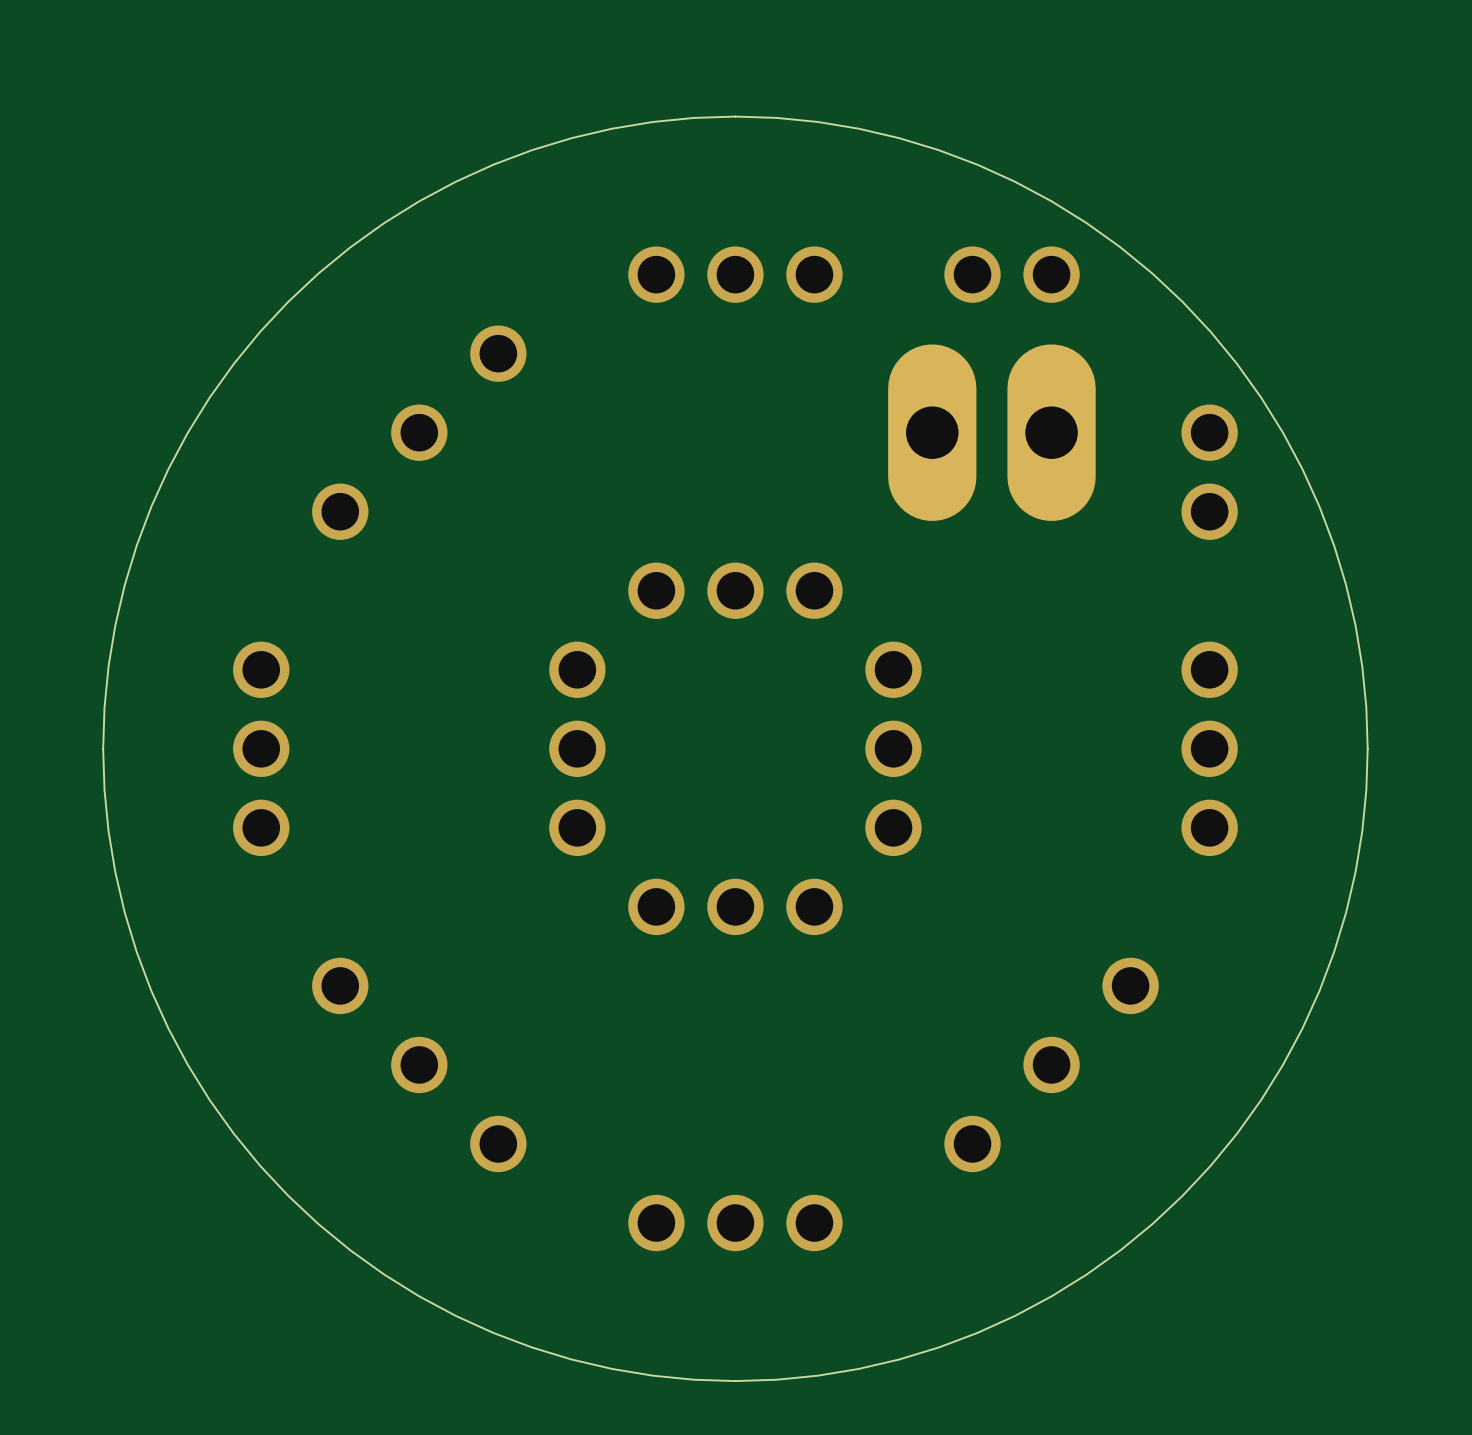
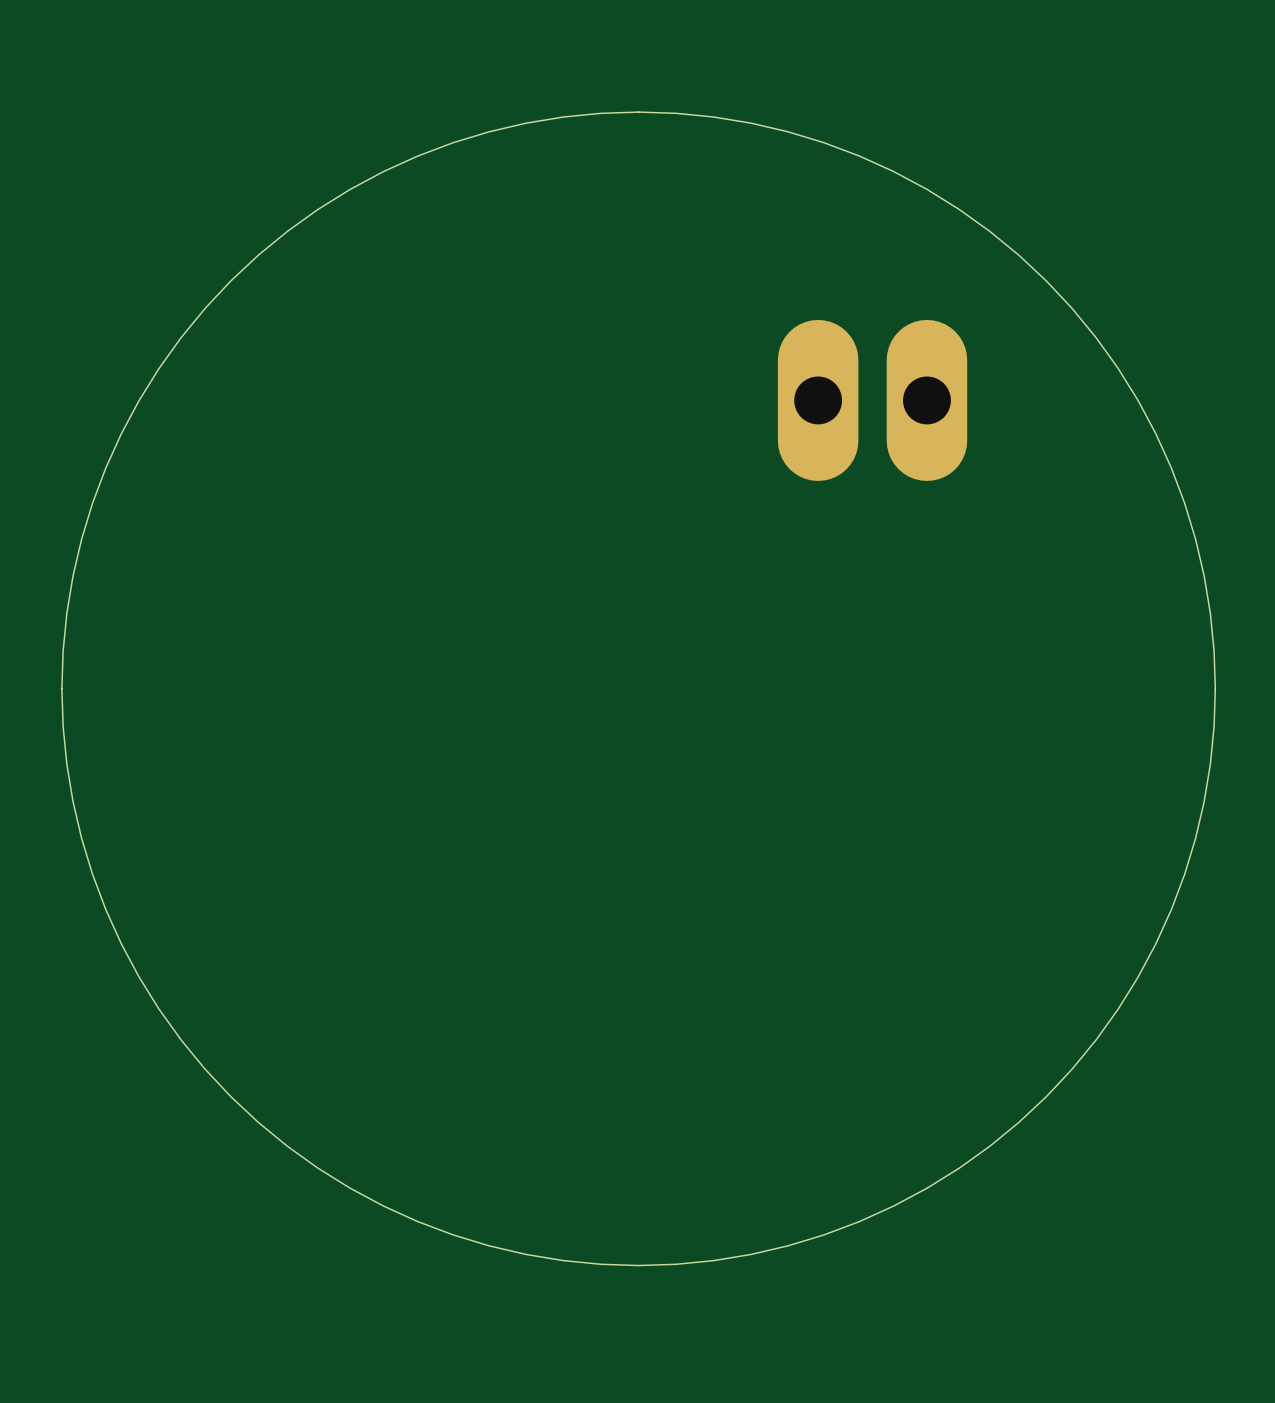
via: (656, 274) -> none
via: (735, 274) -> none
via: (814, 274) -> none
via: (972, 274) -> none
via: (1051, 274) -> none
via: (498, 353) -> none
via: (419, 432) -> none
via: (1209, 432) -> none
via: (340, 511) -> none
via: (1209, 511) -> none
via: (656, 590) -> none
via: (735, 590) -> none
via: (814, 590) -> none
via: (261, 669) -> none
via: (577, 669) -> none
via: (893, 669) -> none
via: (1209, 669) -> none
via: (261, 748) -> none
via: (577, 748) -> none
via: (893, 748) -> none
via: (1209, 748) -> none
via: (261, 827) -> none
via: (577, 827) -> none
via: (893, 827) -> none
via: (1209, 827) -> none
via: (656, 906) -> none
via: (735, 906) -> none
via: (814, 906) -> none
via: (340, 985) -> none
via: (1130, 985) -> none
via: (419, 1064) -> none
via: (1051, 1064) -> none
via: (498, 1143) -> none
via: (972, 1143) -> none
via: (656, 1223) -> none
via: (735, 1223) -> none
via: (814, 1223) -> none

